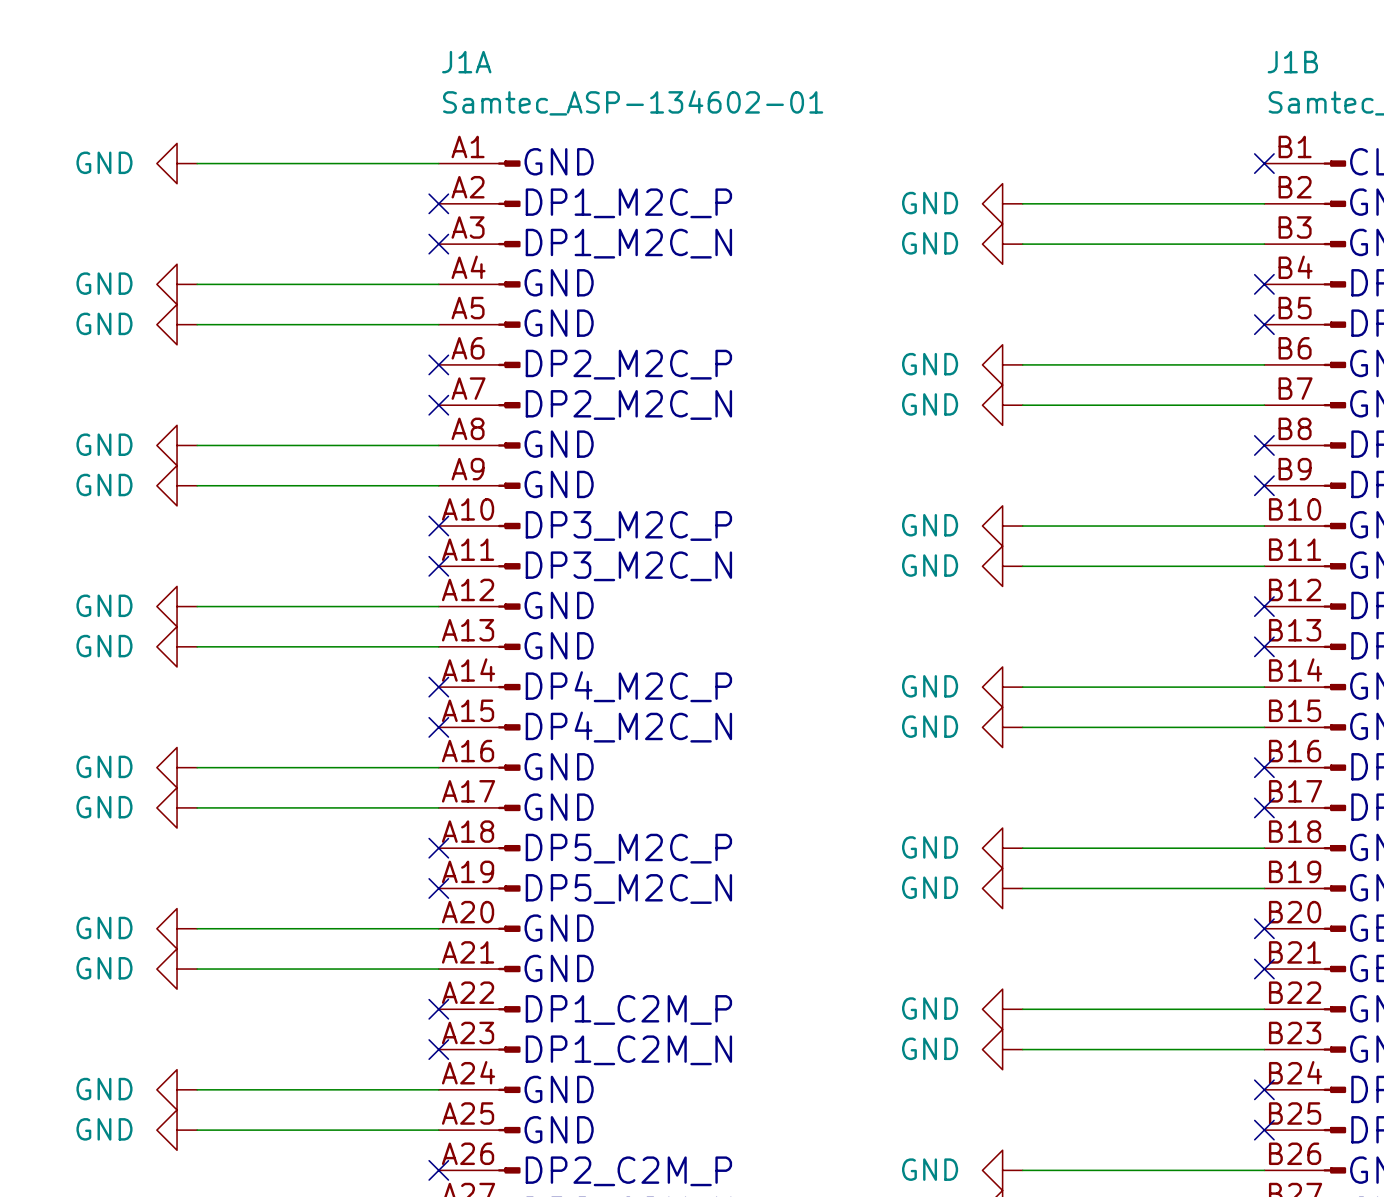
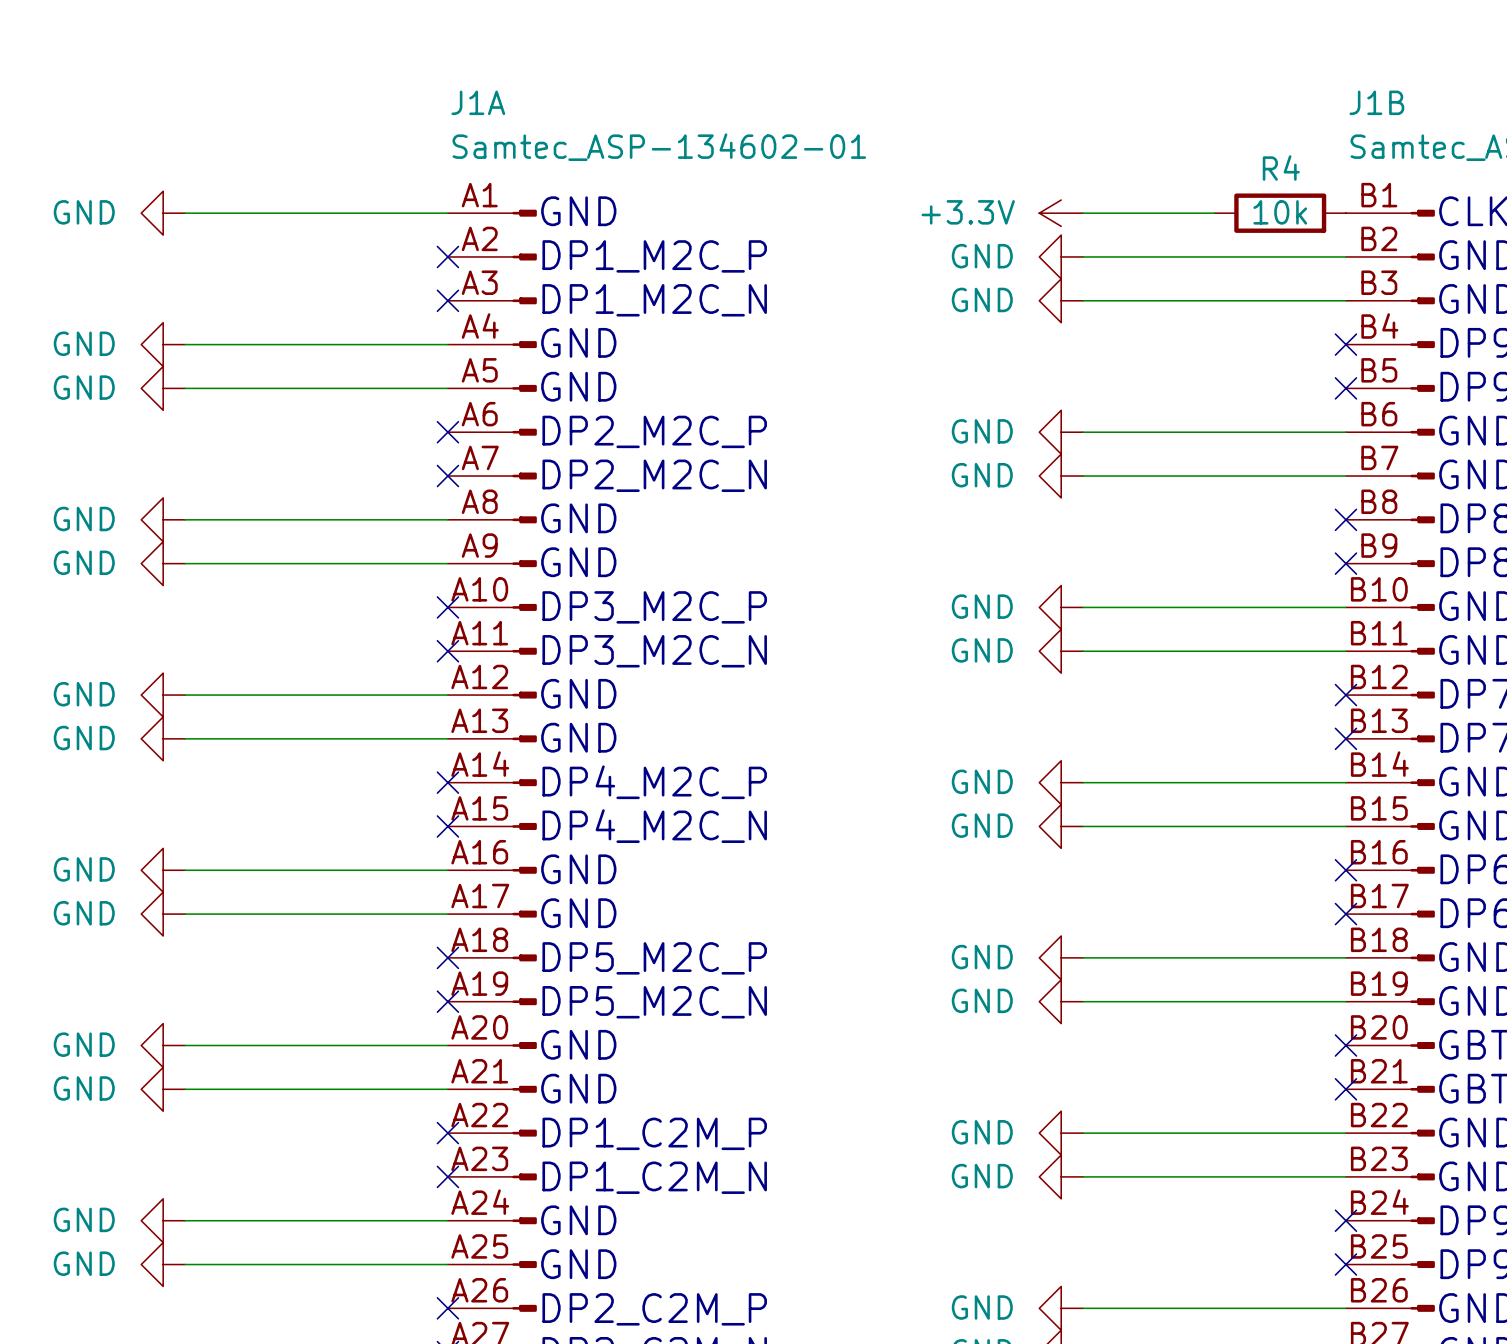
power symbol: none -> +3.3V (1061, 213)
wire: none -> (1083, 213) (1214, 213)
R4: none -> 10k (1280, 213)
no-connect mark: (1264, 163) -> none

